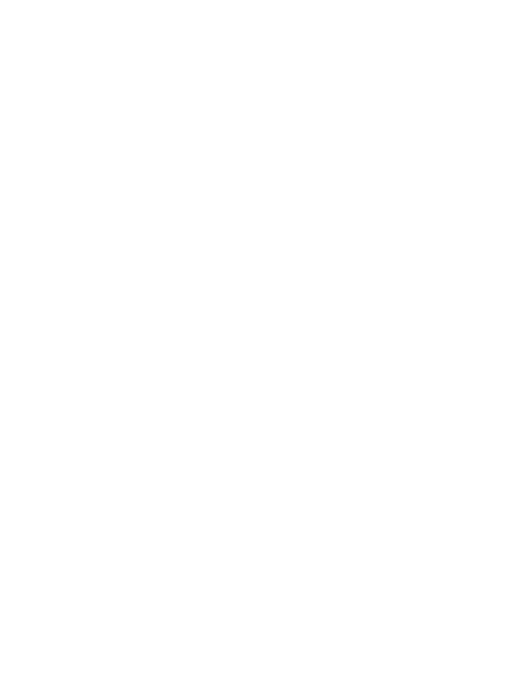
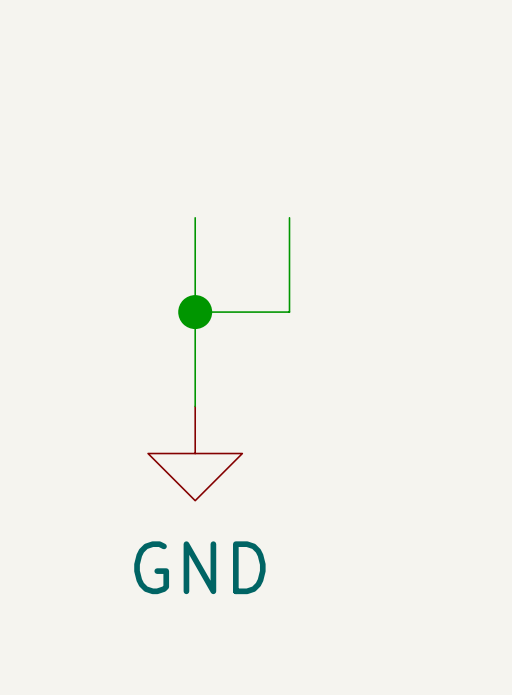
wire: none -> (195, 217) (195, 406)
wire: none -> (289, 217) (289, 312) (195, 312)
junction: none -> (195, 312)
power symbol: none -> GND (195, 453)

